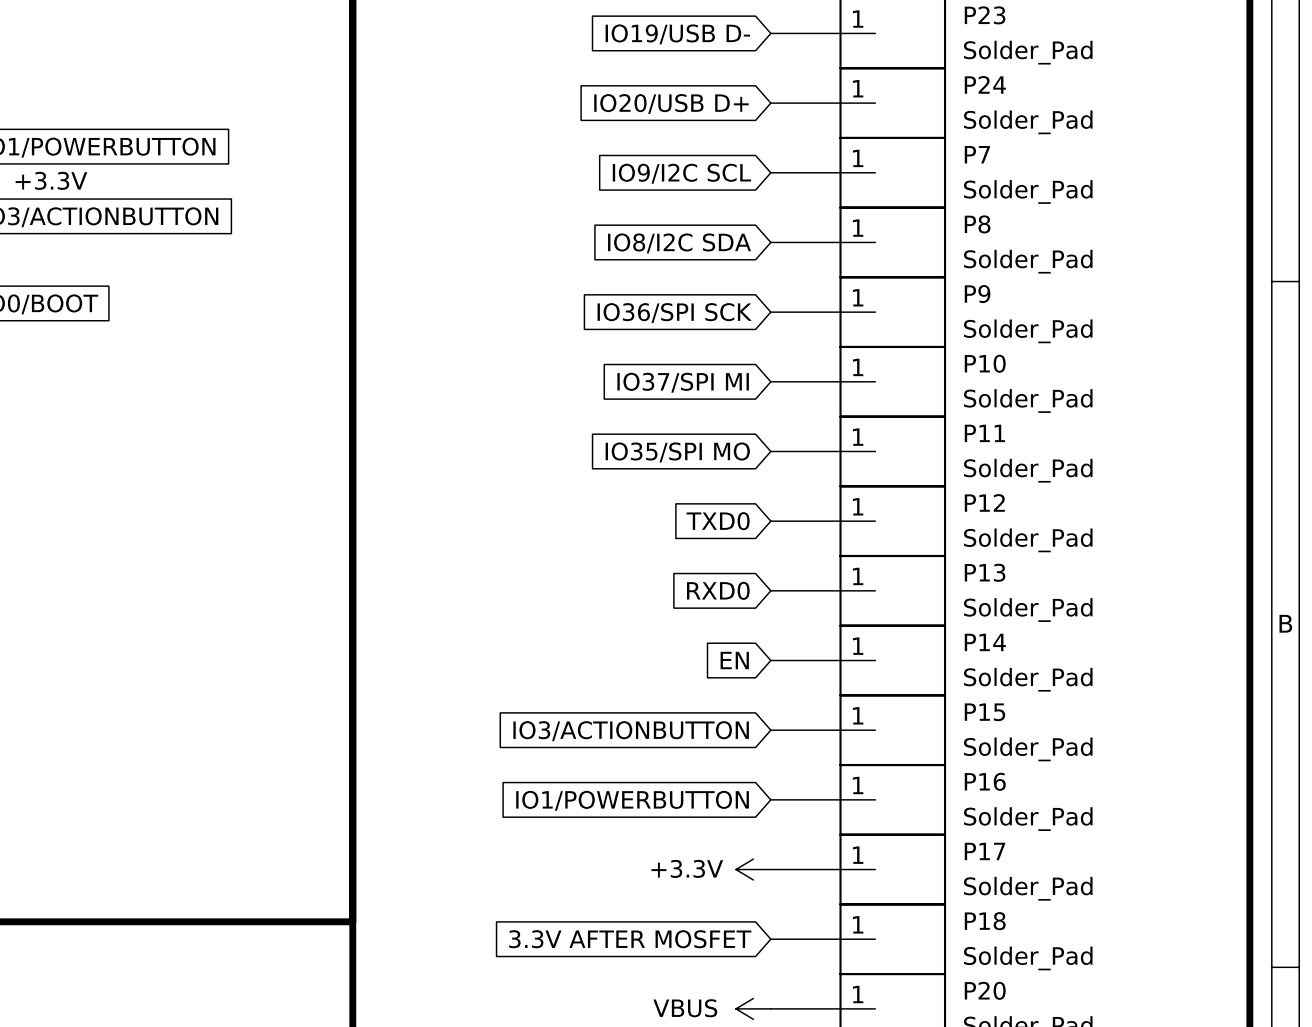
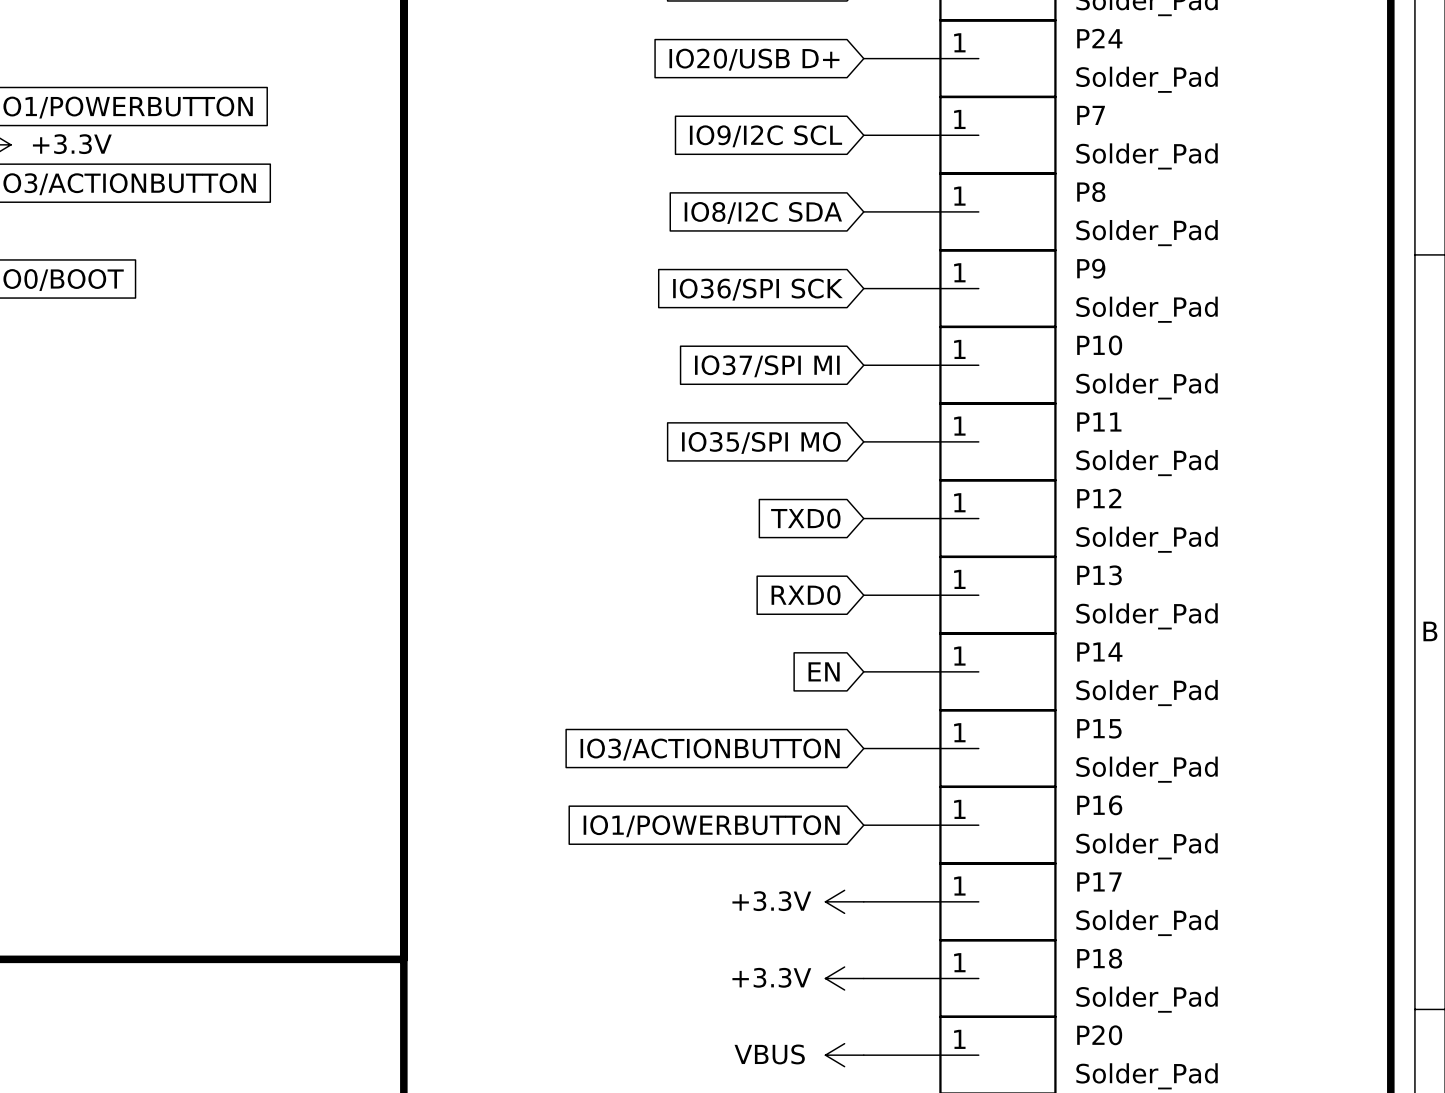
global label: 3.3V AFTER MOSFET (630, 939) -> none
power symbol: none -> +3.3V (844, 978)

